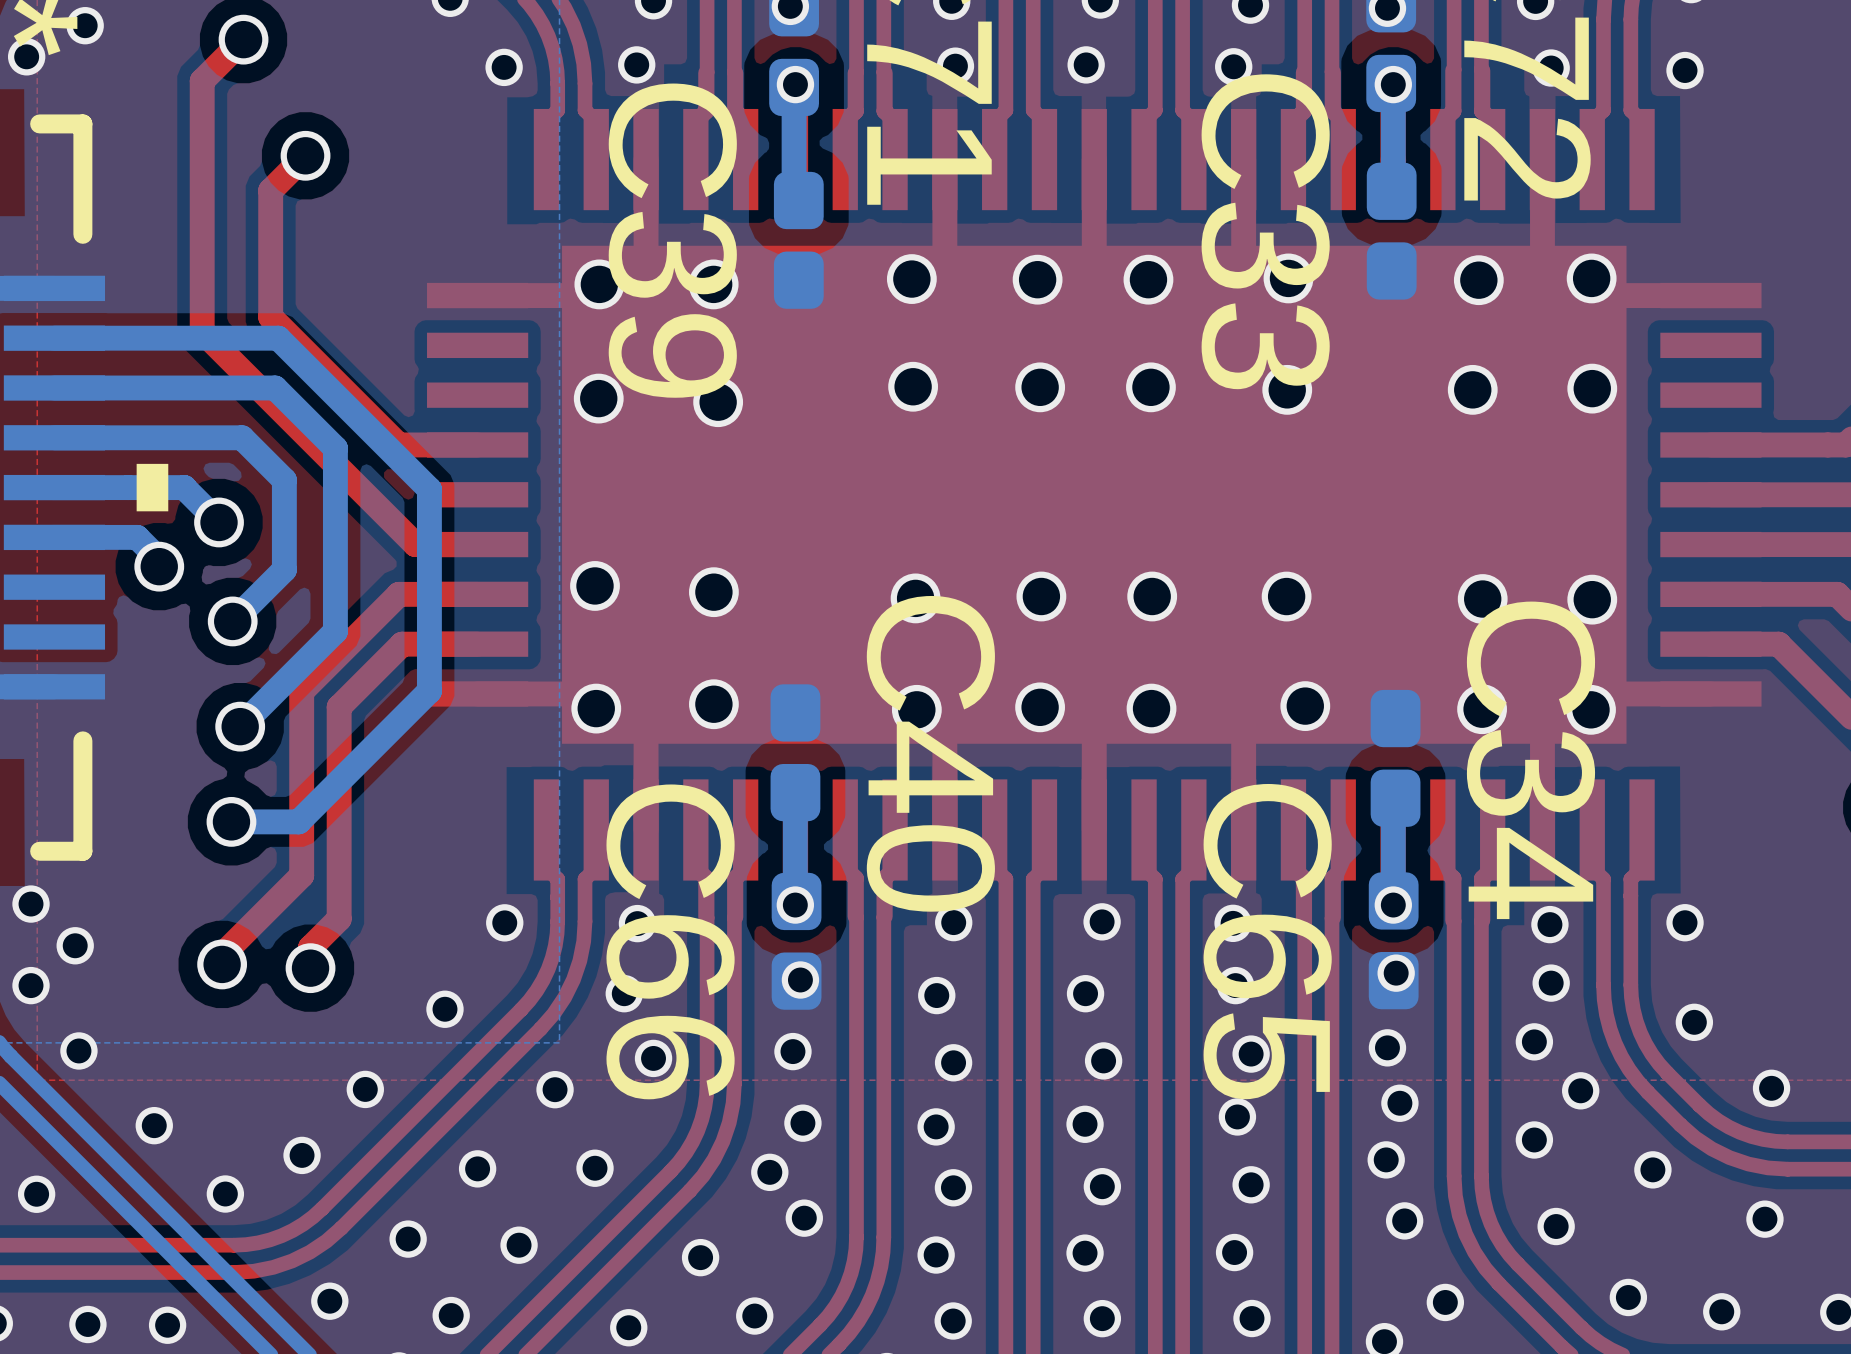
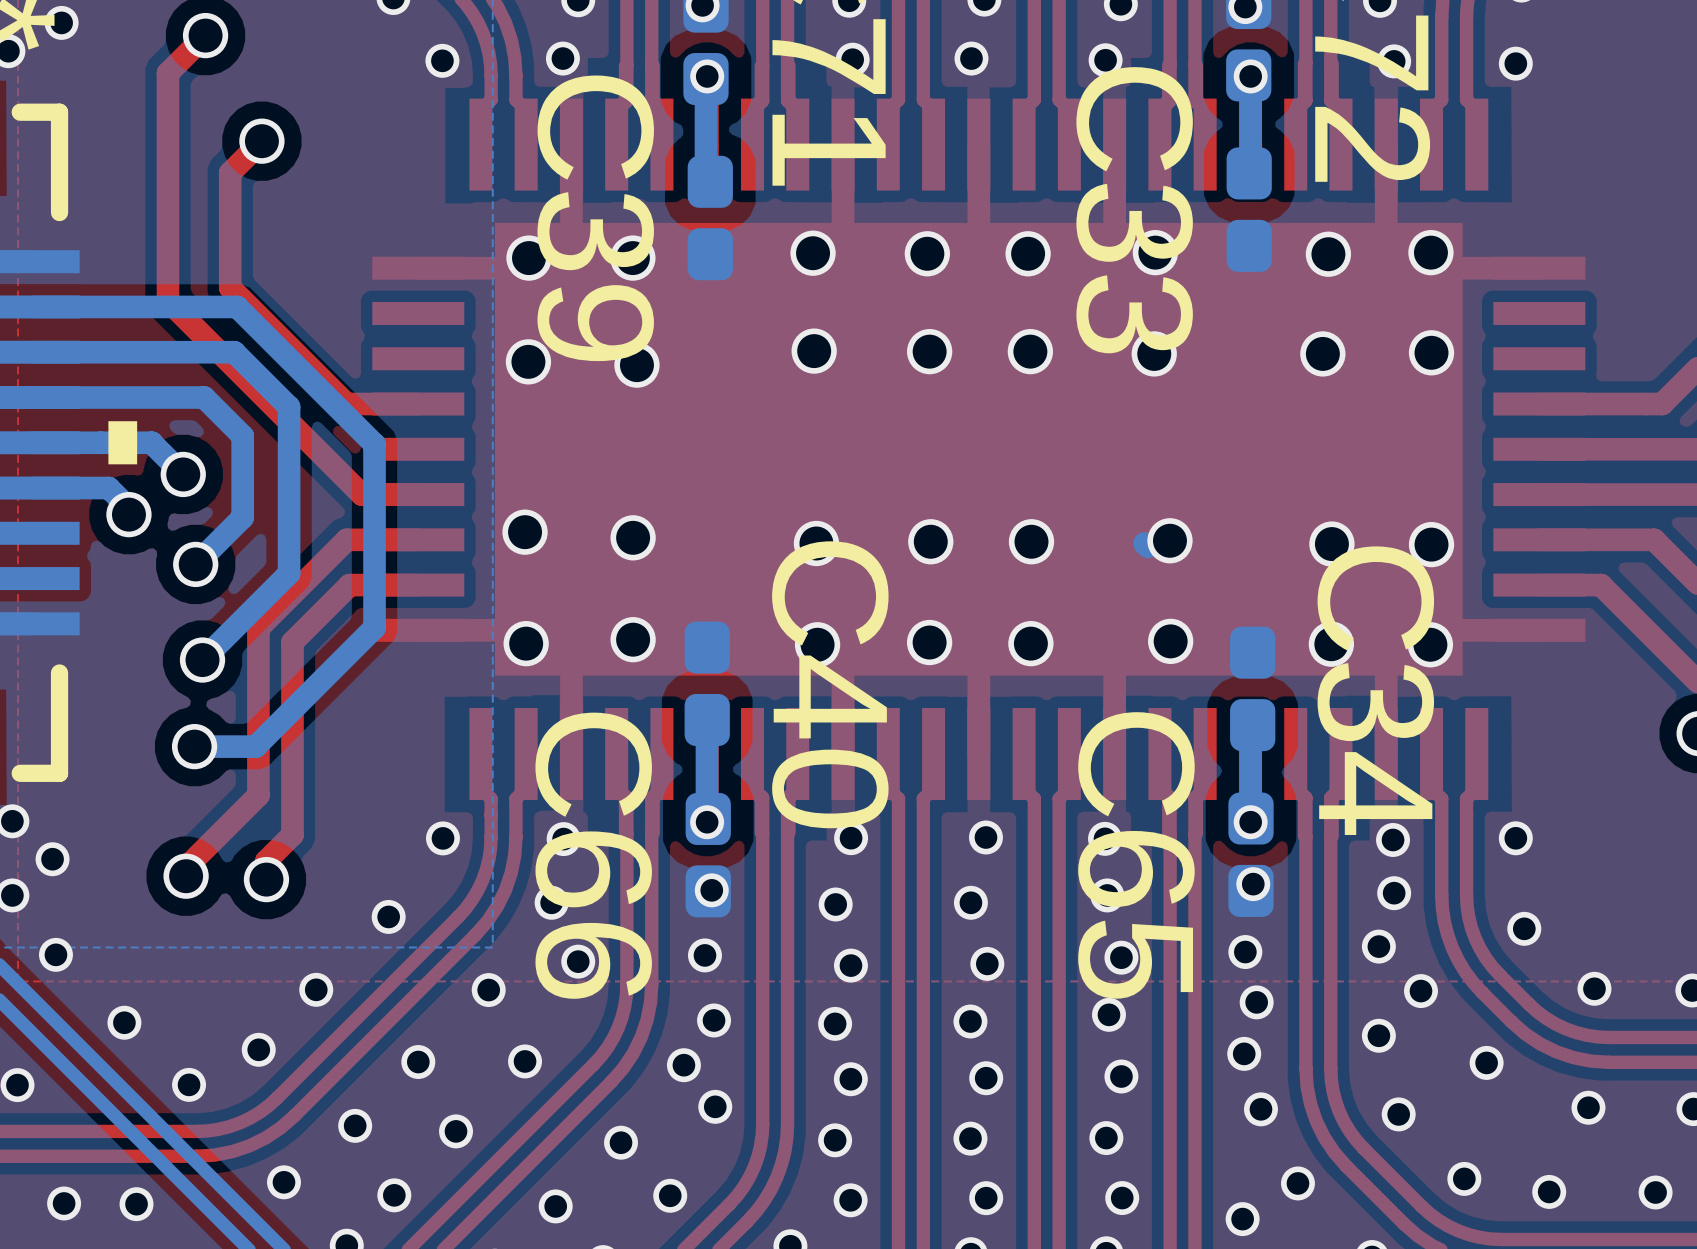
via position: (1286, 596) -> (1169, 540)

